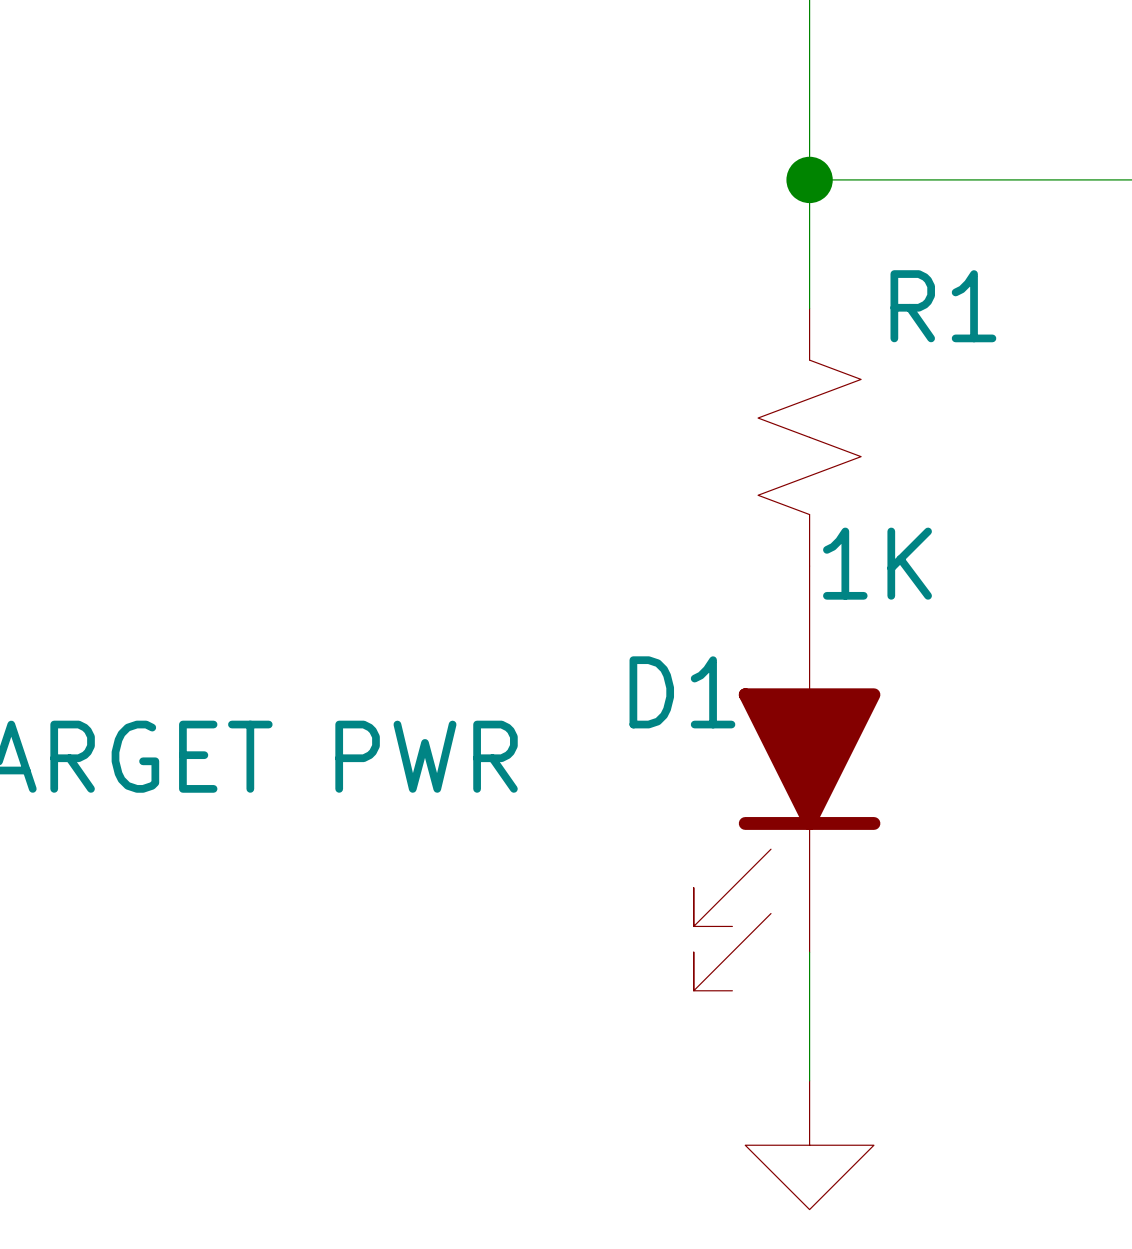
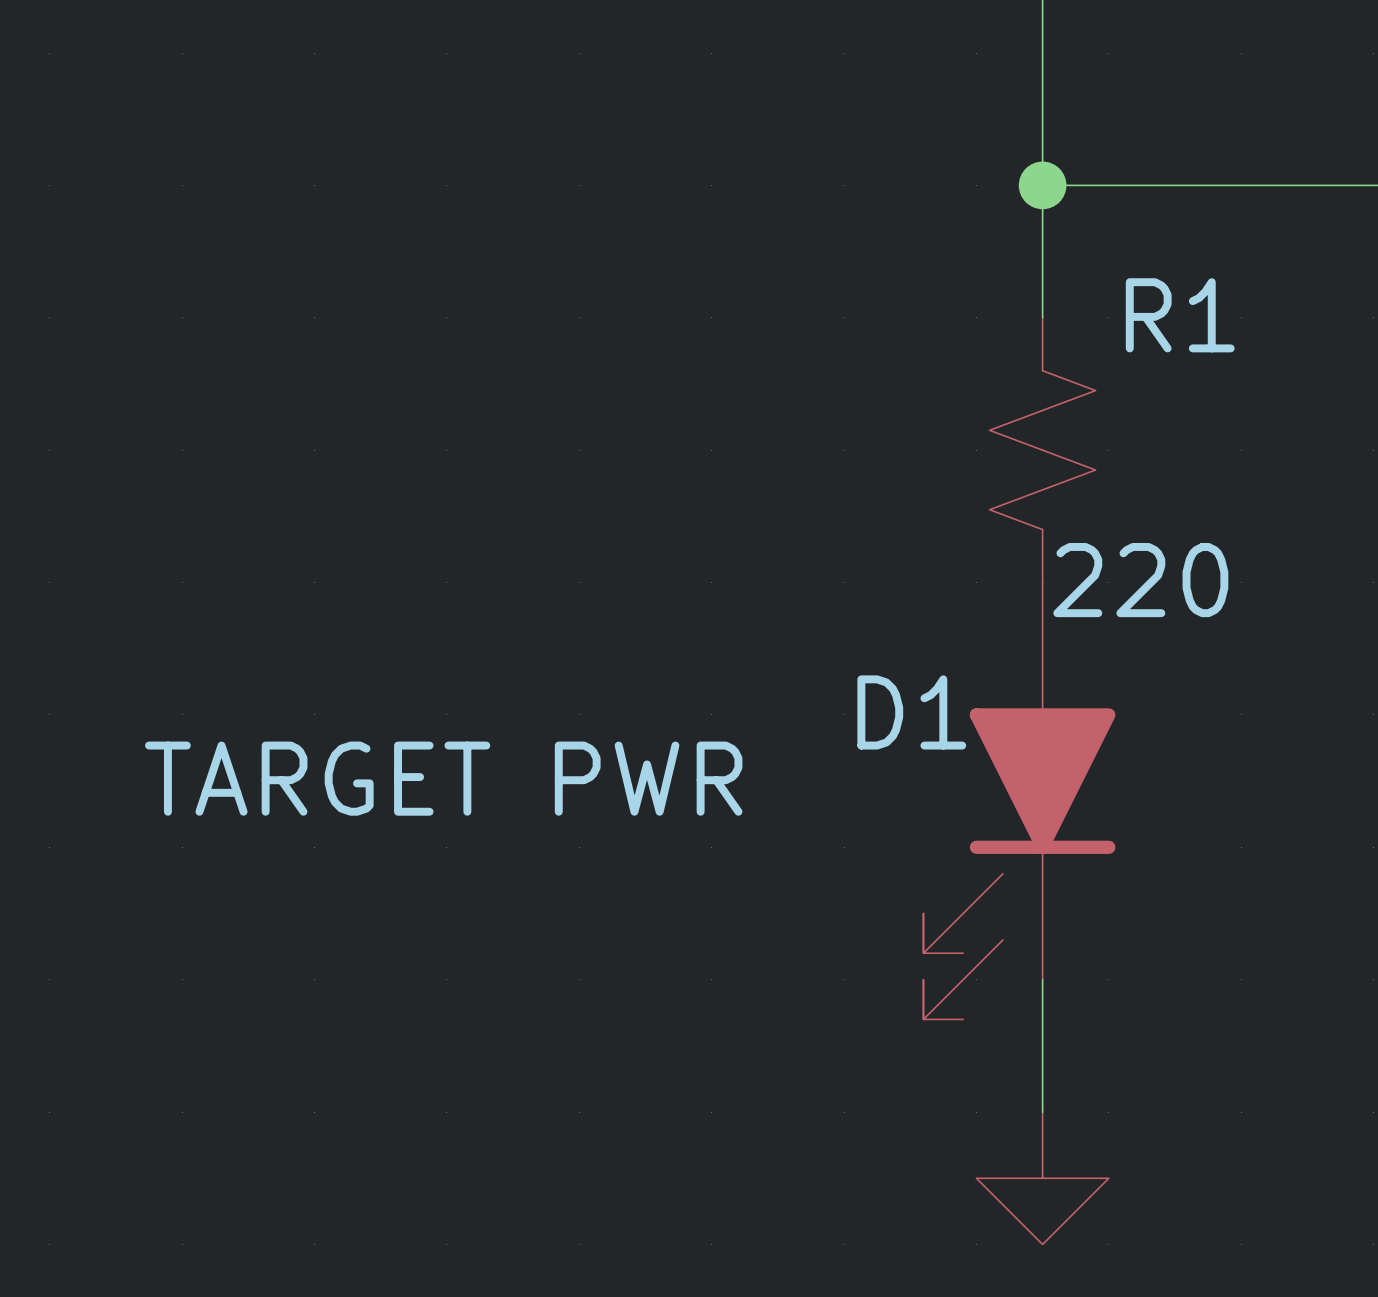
R1 value: 1K (877, 563) -> 220 (1140, 580)

